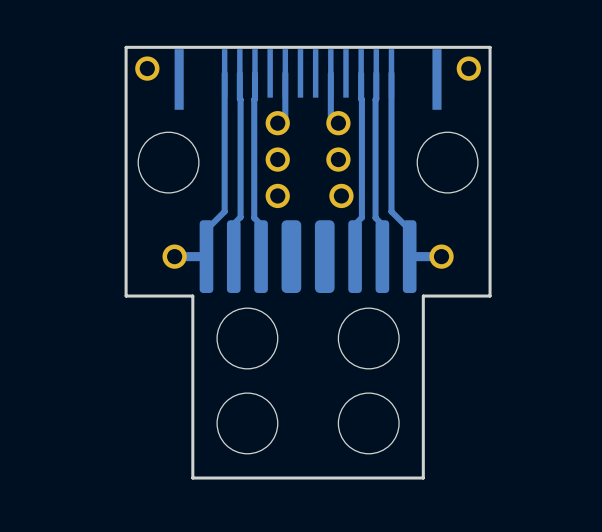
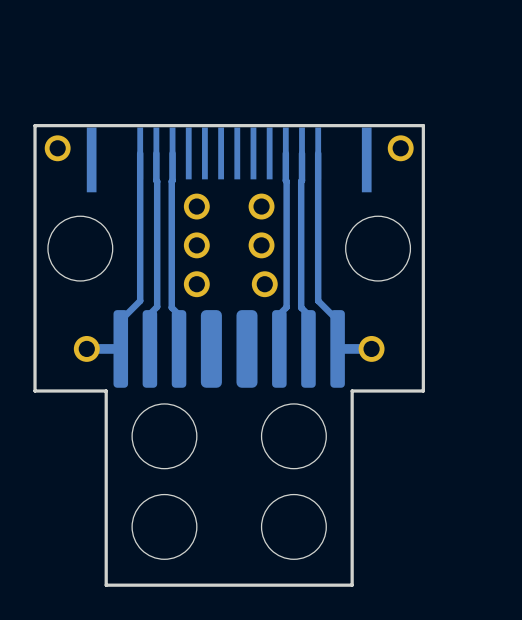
track: (285, 73) (285, 118) -> none
track: (330, 73) (330, 118) -> none

